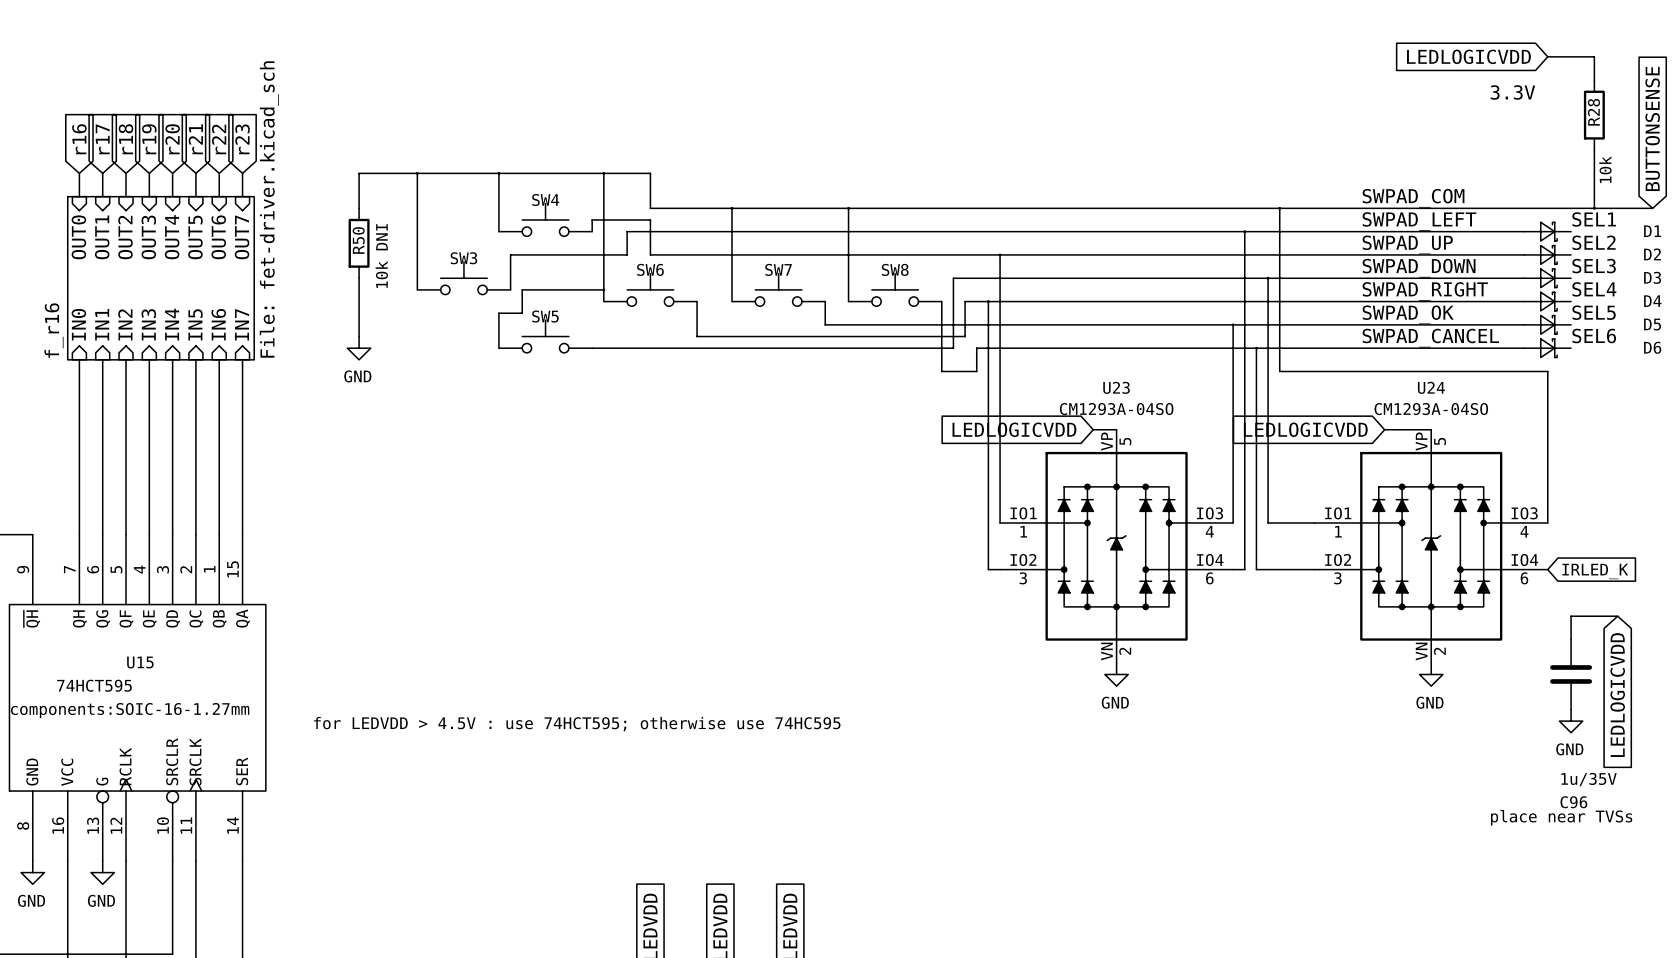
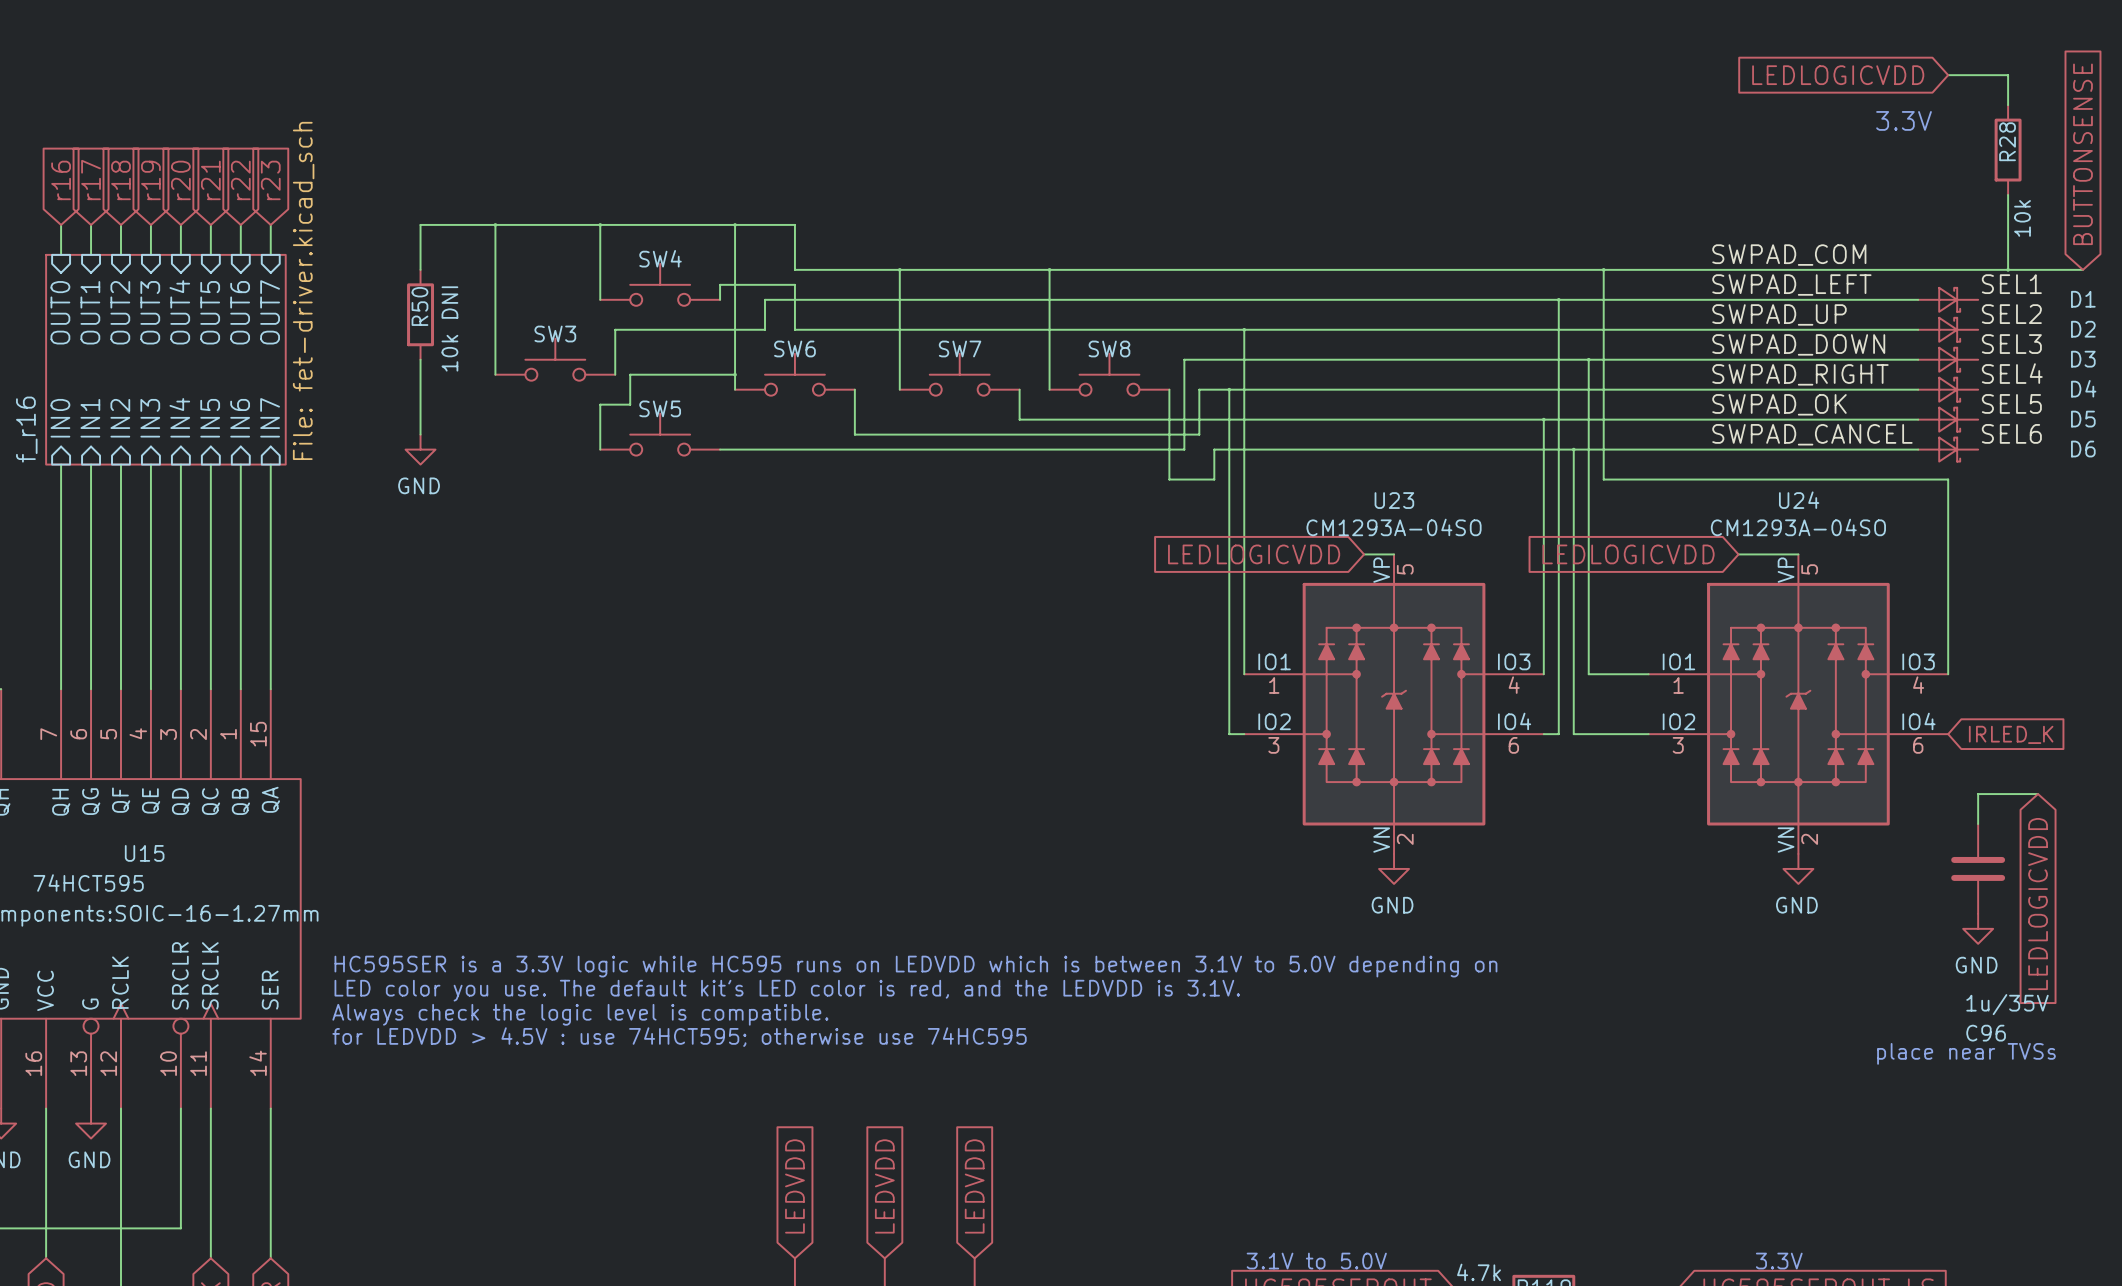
text position: for LEDVDD > 4.5V : use 74HCT595; otherwise use 74HC595 (577, 724) -> for LEDVDD > 4.5V : use 74HCT595; otherwise use 74HC595 (679, 1037)
text: none -> HC595SER is a 3.3V logic while HC595 runs on LEDVDD which is between 3.1V to 5.0V depending on (915, 966)
text: none -> LED color you use. The default kit's LED color is red, and the LEDVDD is 3.1V. (787, 990)
text: none -> Always check the logic level is compatible. (580, 1014)

